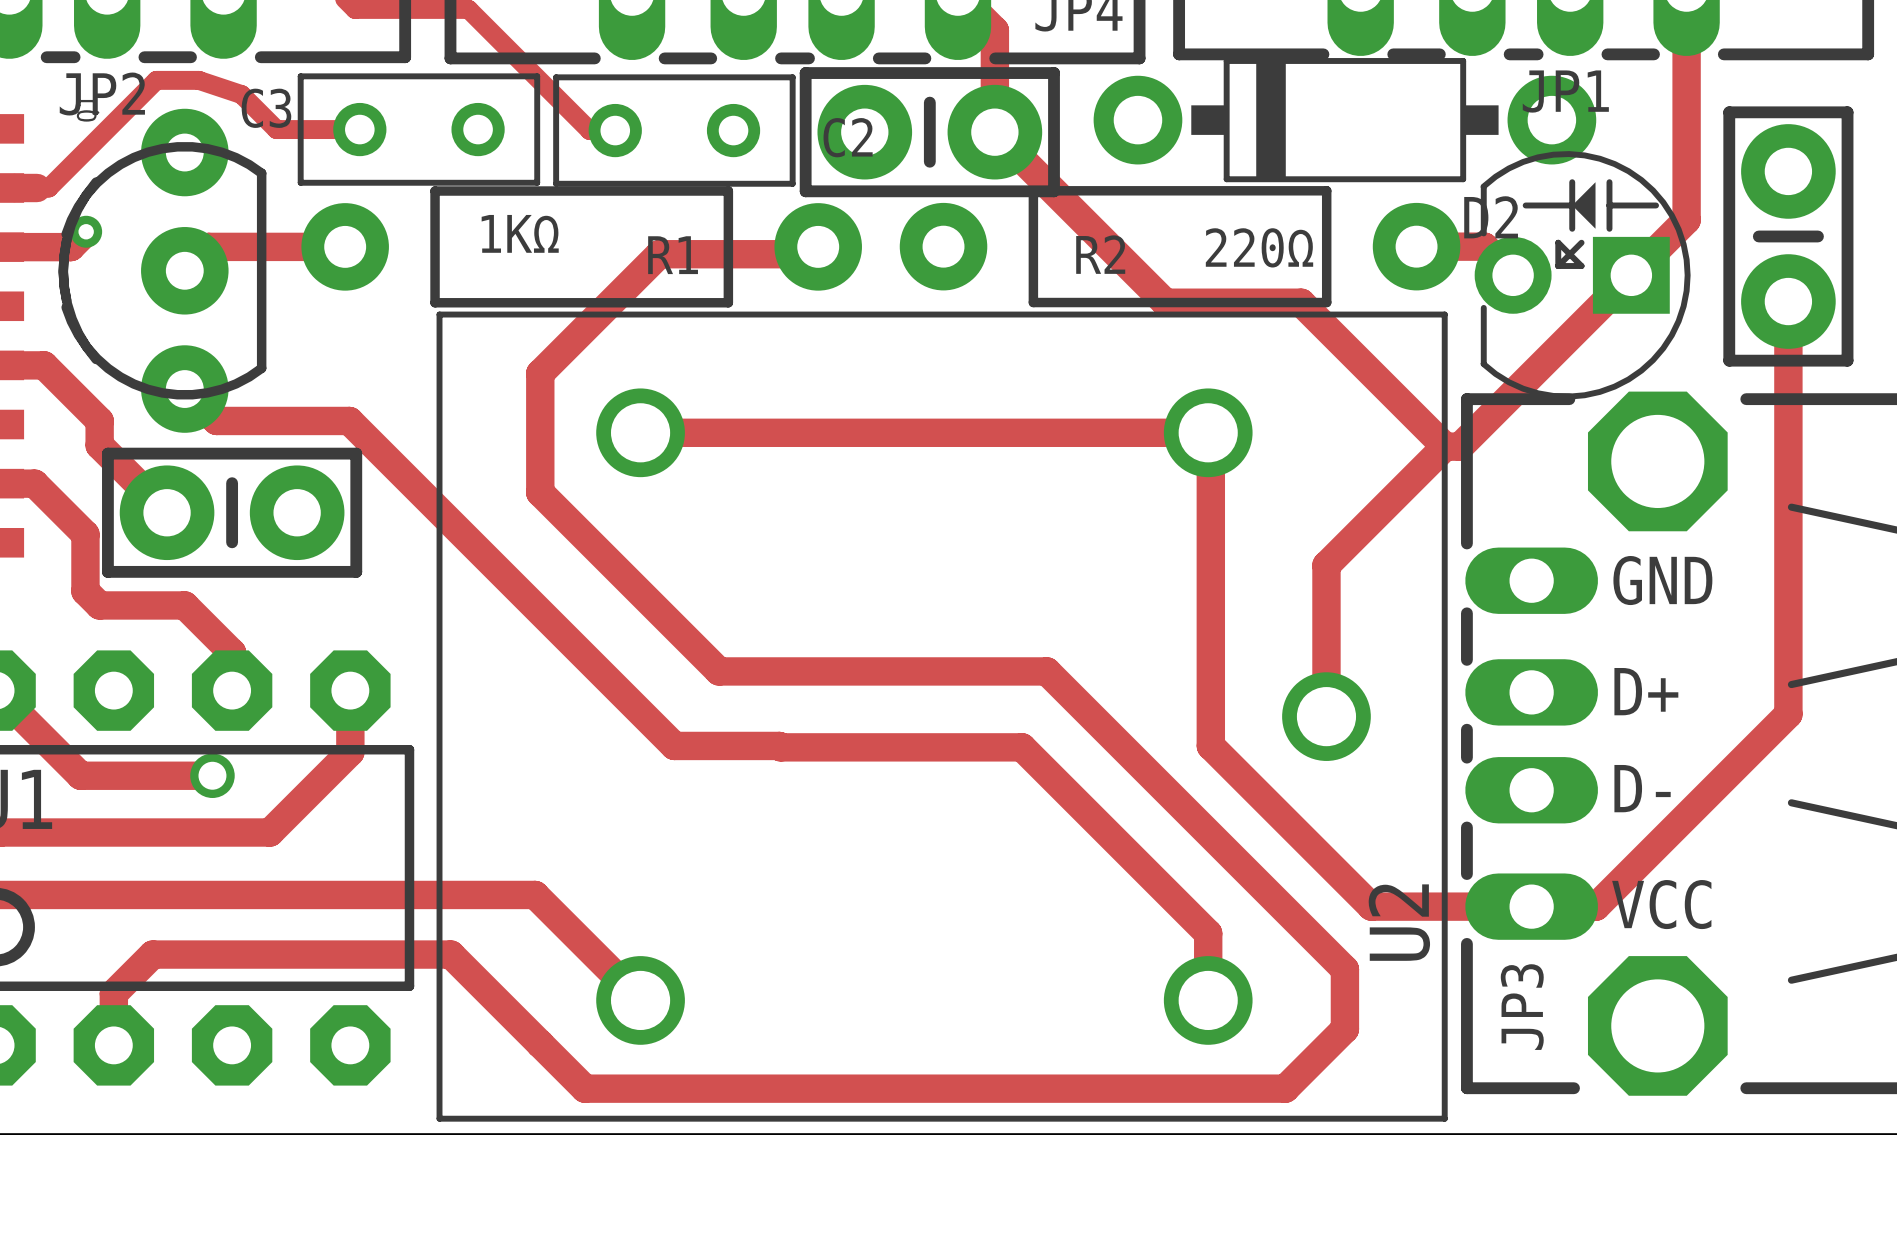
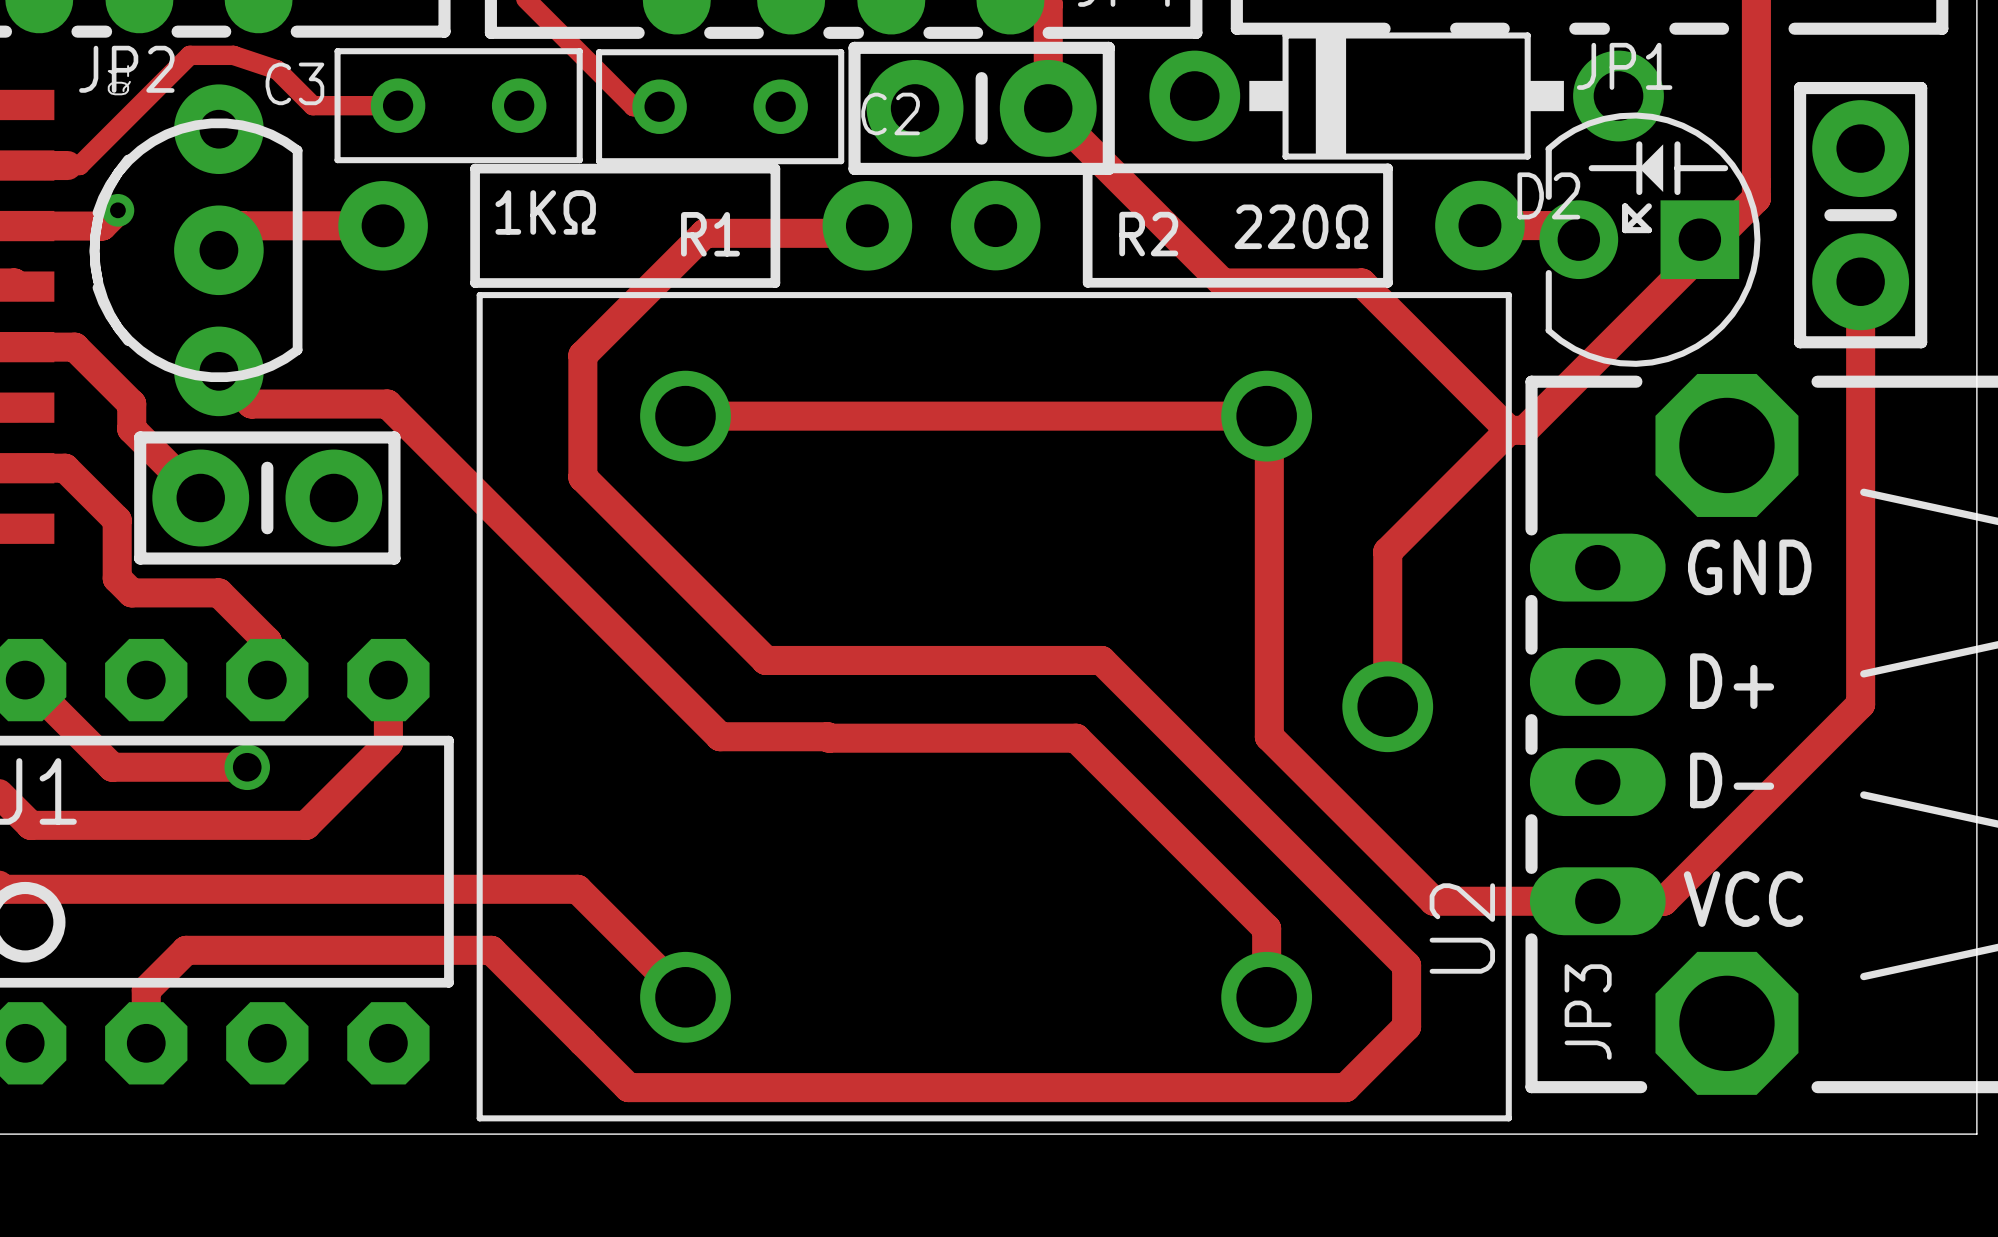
part position: (1582, 275) -> (1649, 239)

